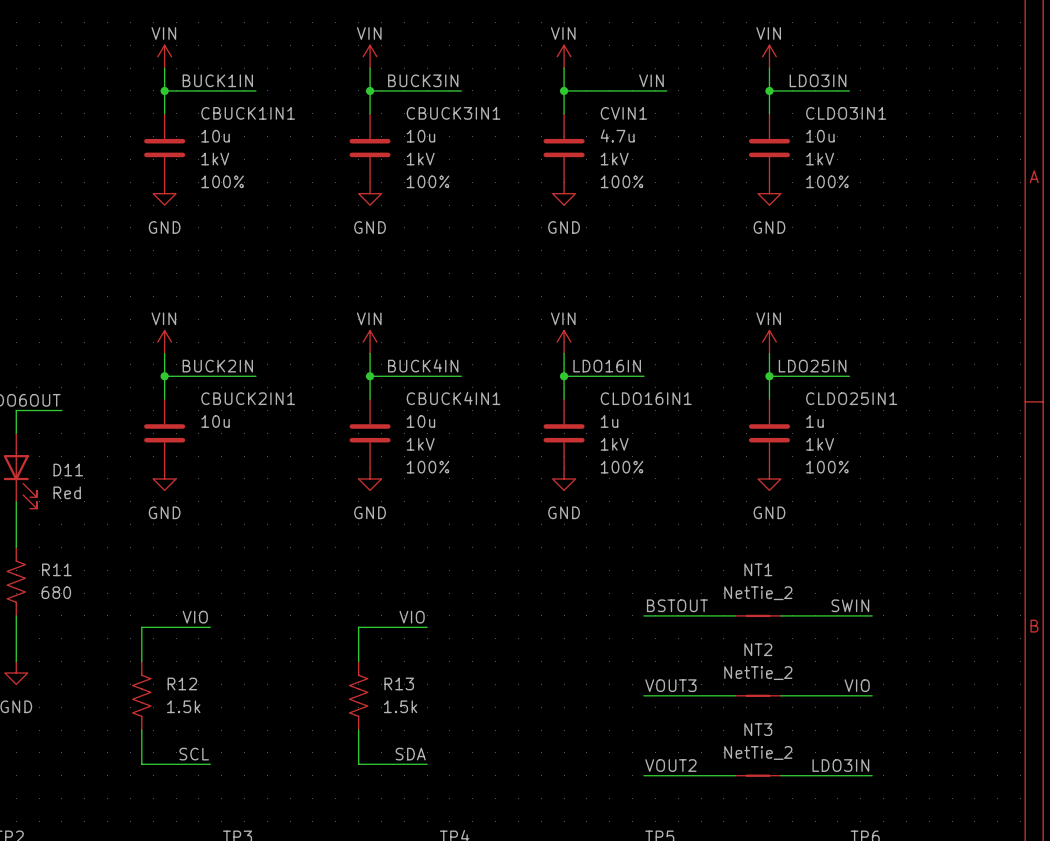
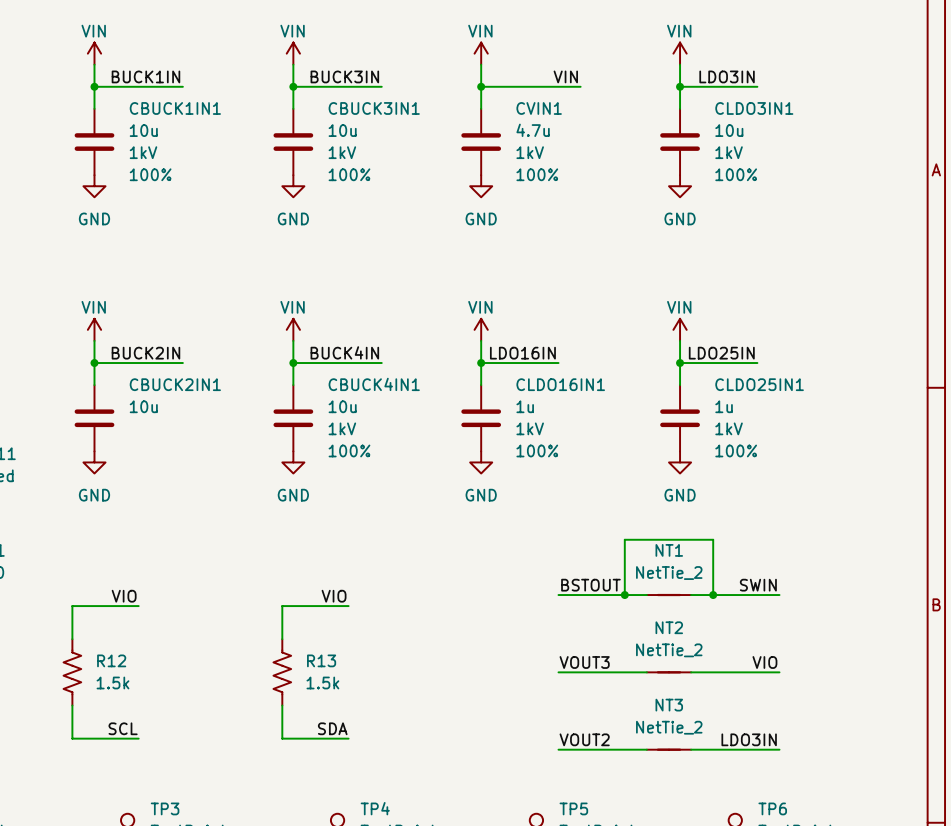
wire: none -> (624, 595) (624, 539) (713, 539) (713, 595)
junction: none -> (624, 595)
junction: none -> (713, 595)

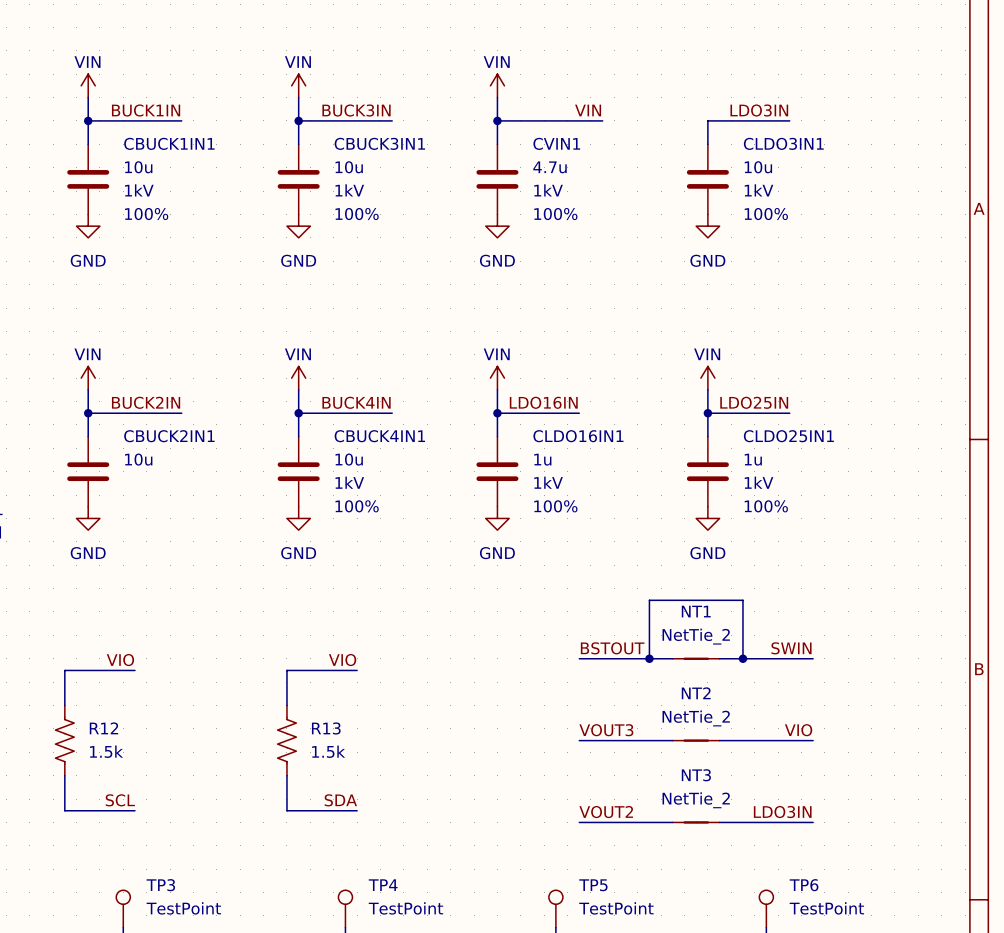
power symbol: VIN (680, 53) -> none
wire: (680, 64) (680, 86) -> none
junction: (680, 86) -> none

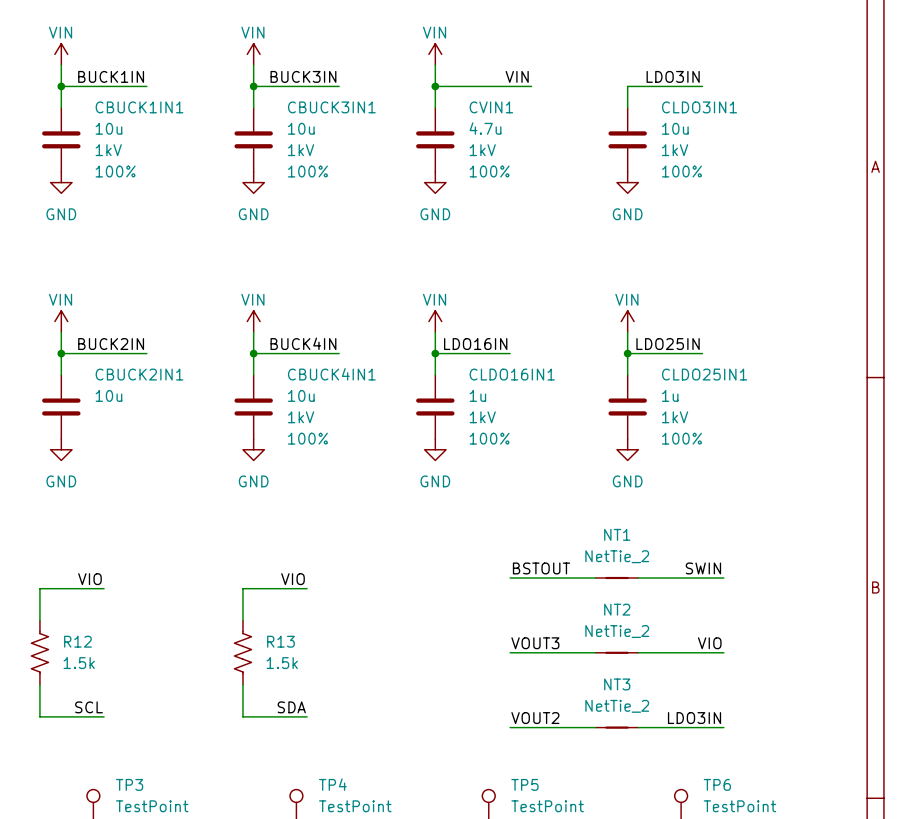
wire: (649, 658) (649, 600) (742, 600) (742, 658) -> none
junction: (649, 658) -> none
junction: (742, 658) -> none

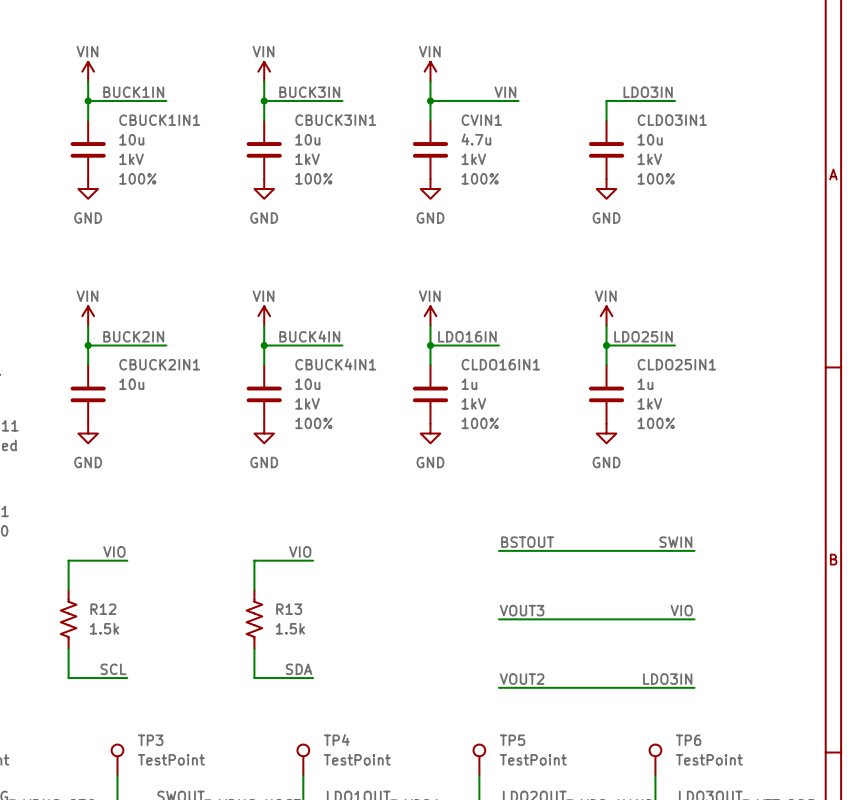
NT1: NetTie_2 (616, 577) -> none
NT2: NetTie_2 (616, 652) -> none
NT3: NetTie_2 (616, 727) -> none

